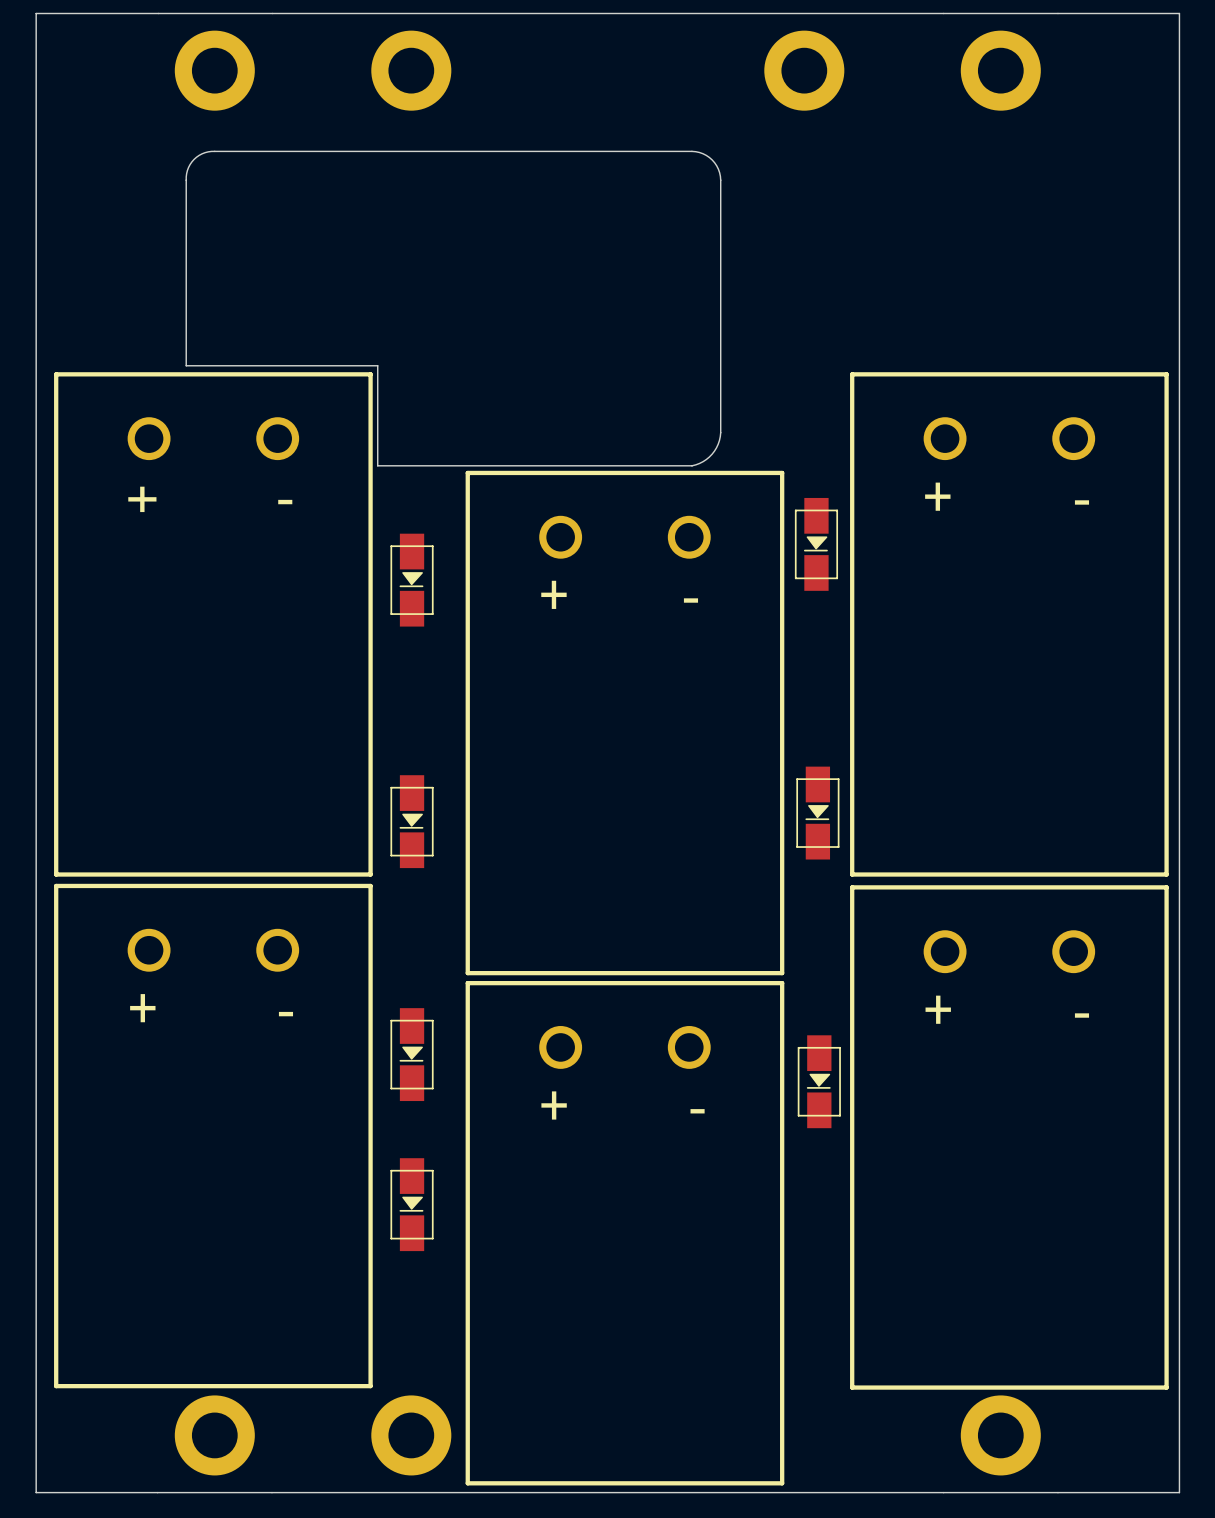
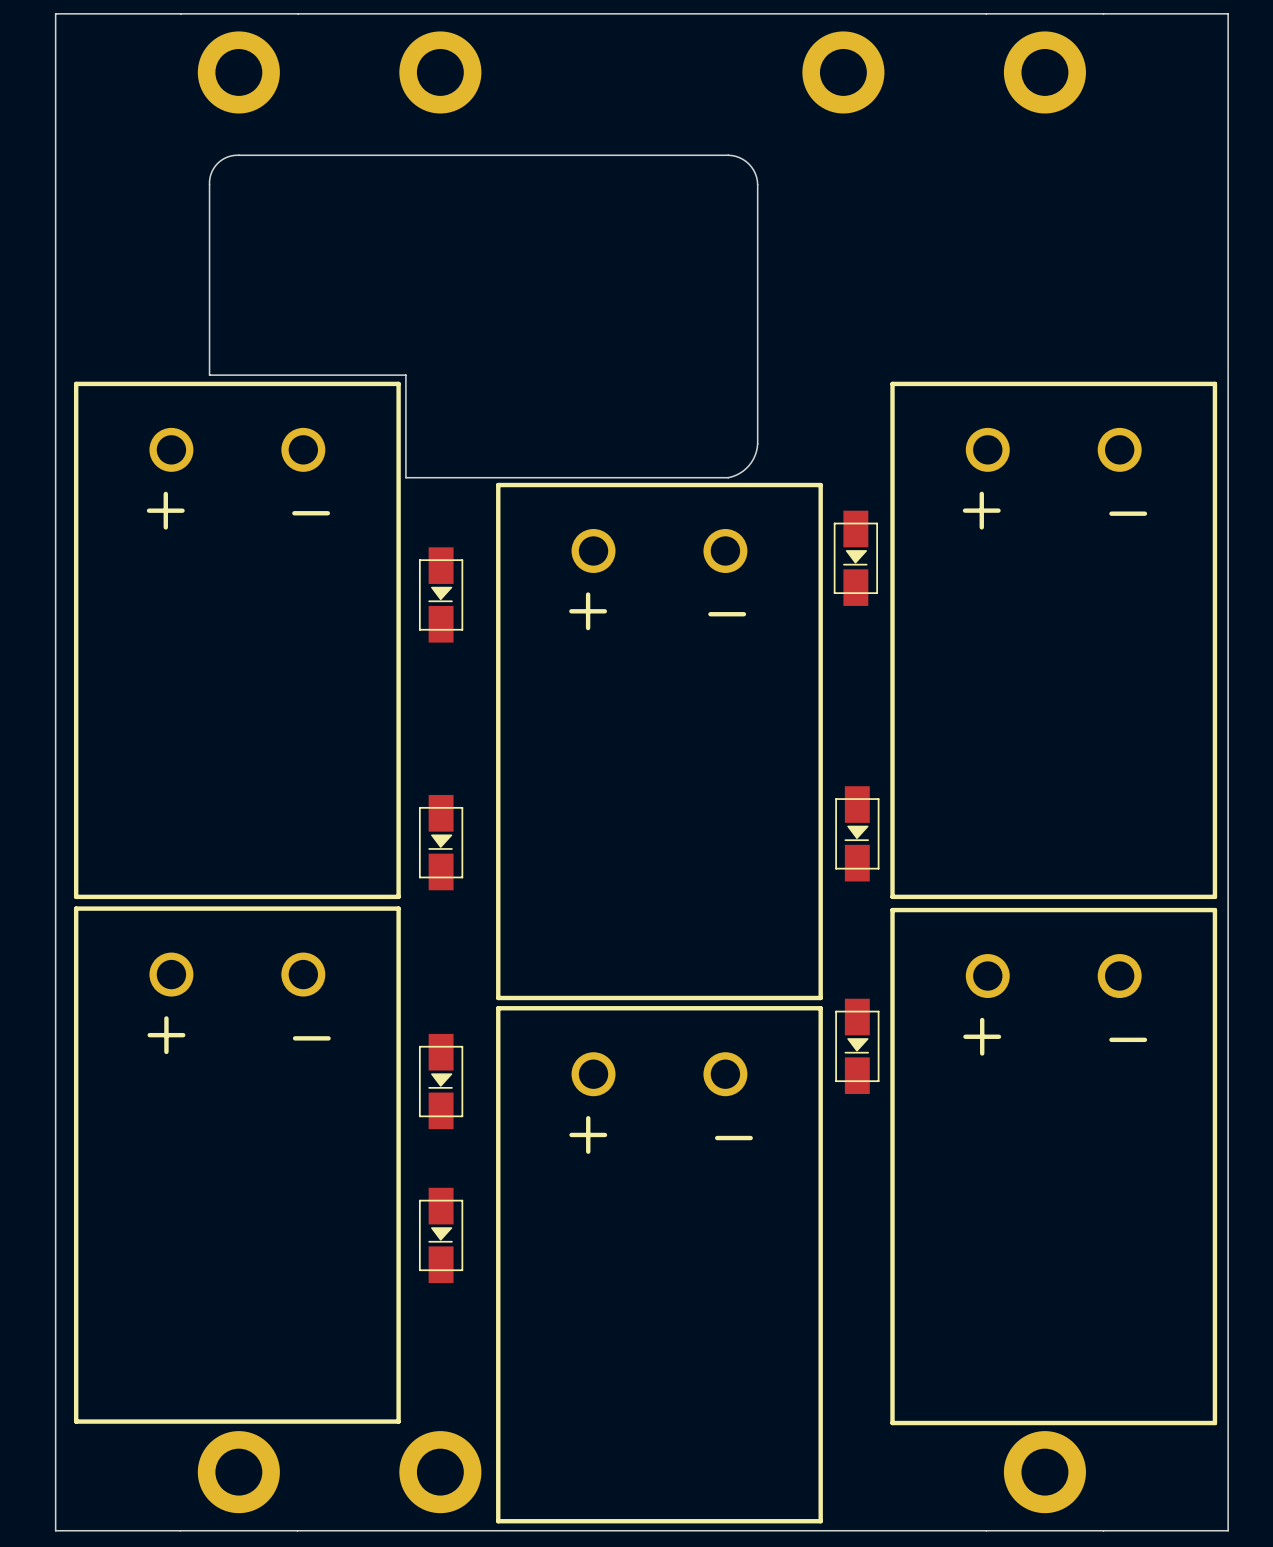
part position: (819, 1081) -> (857, 1046)

